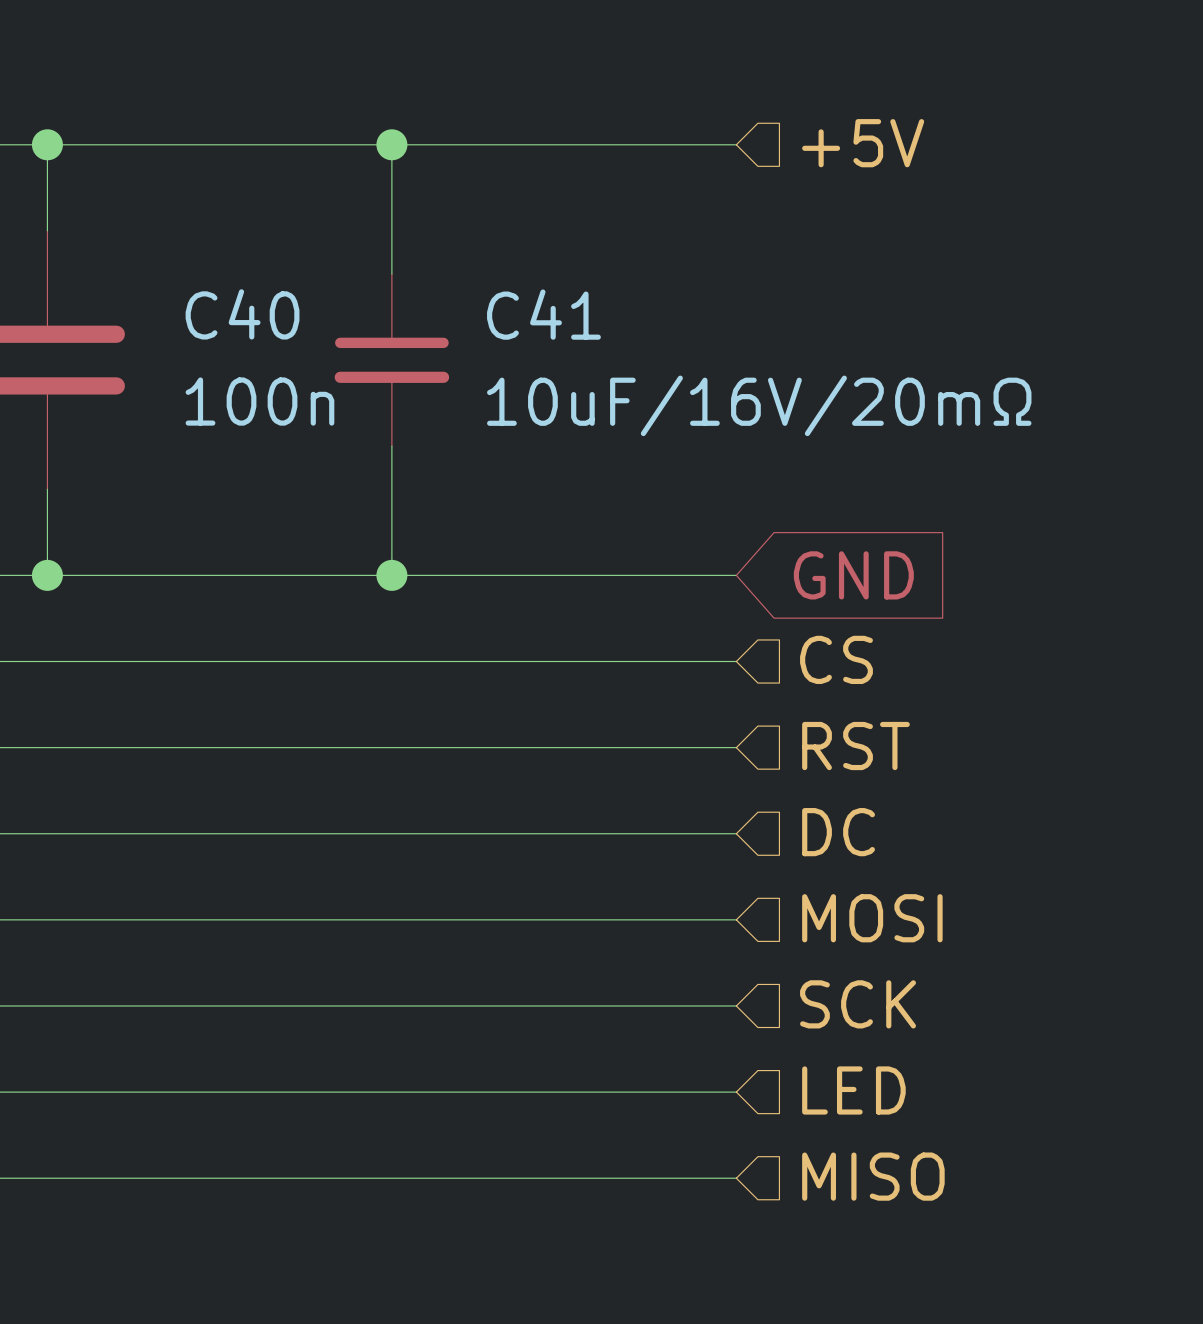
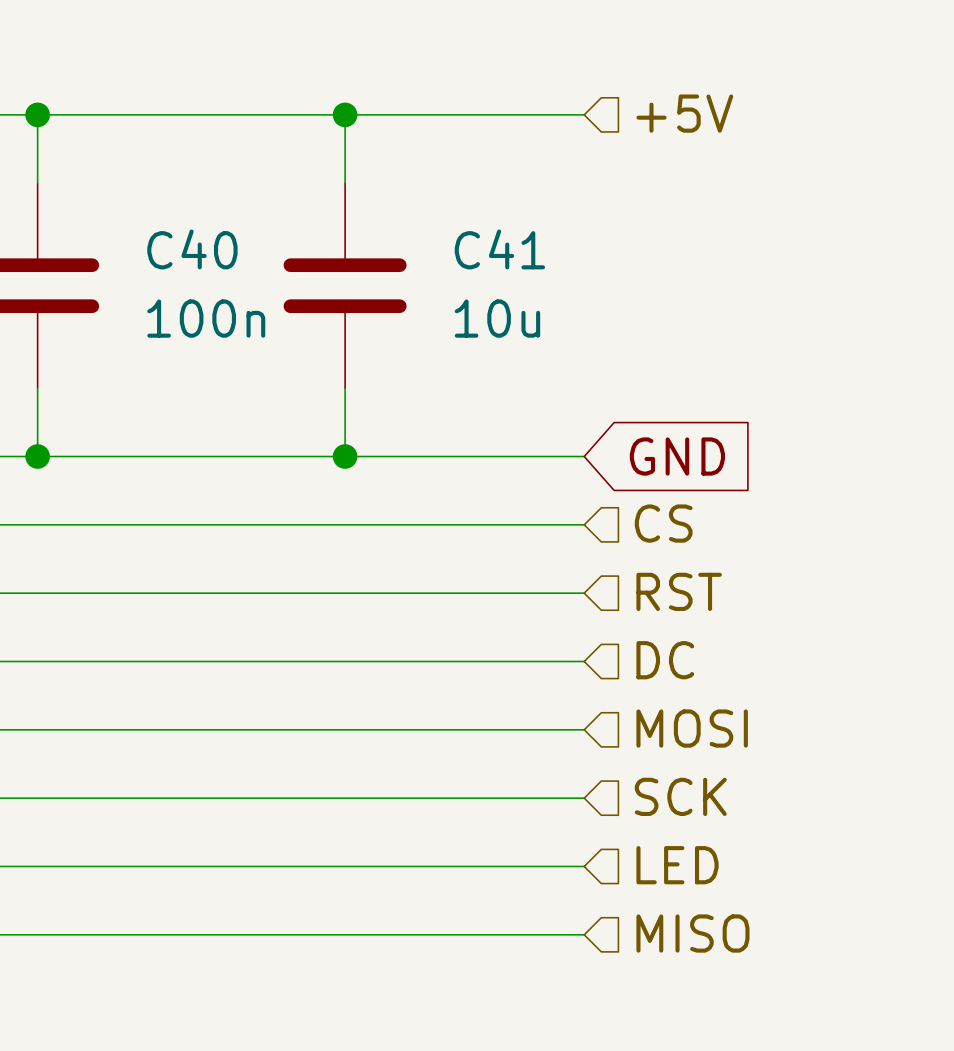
wire: (391, 144) (391, 273) -> none
junction position: (391, 144) -> (345, 114)
wire: none -> (345, 114) (345, 183)
C41 symbol: [334, 273, 450, 447] -> [283, 183, 407, 389]
C41 value: none -> 10u (497, 318)
C41 text: 10uF/16V/20mΩ (759, 405) -> none
wire: (391, 446) (391, 575) -> none
wire: none -> (345, 388) (345, 456)
junction position: (391, 575) -> (345, 456)

